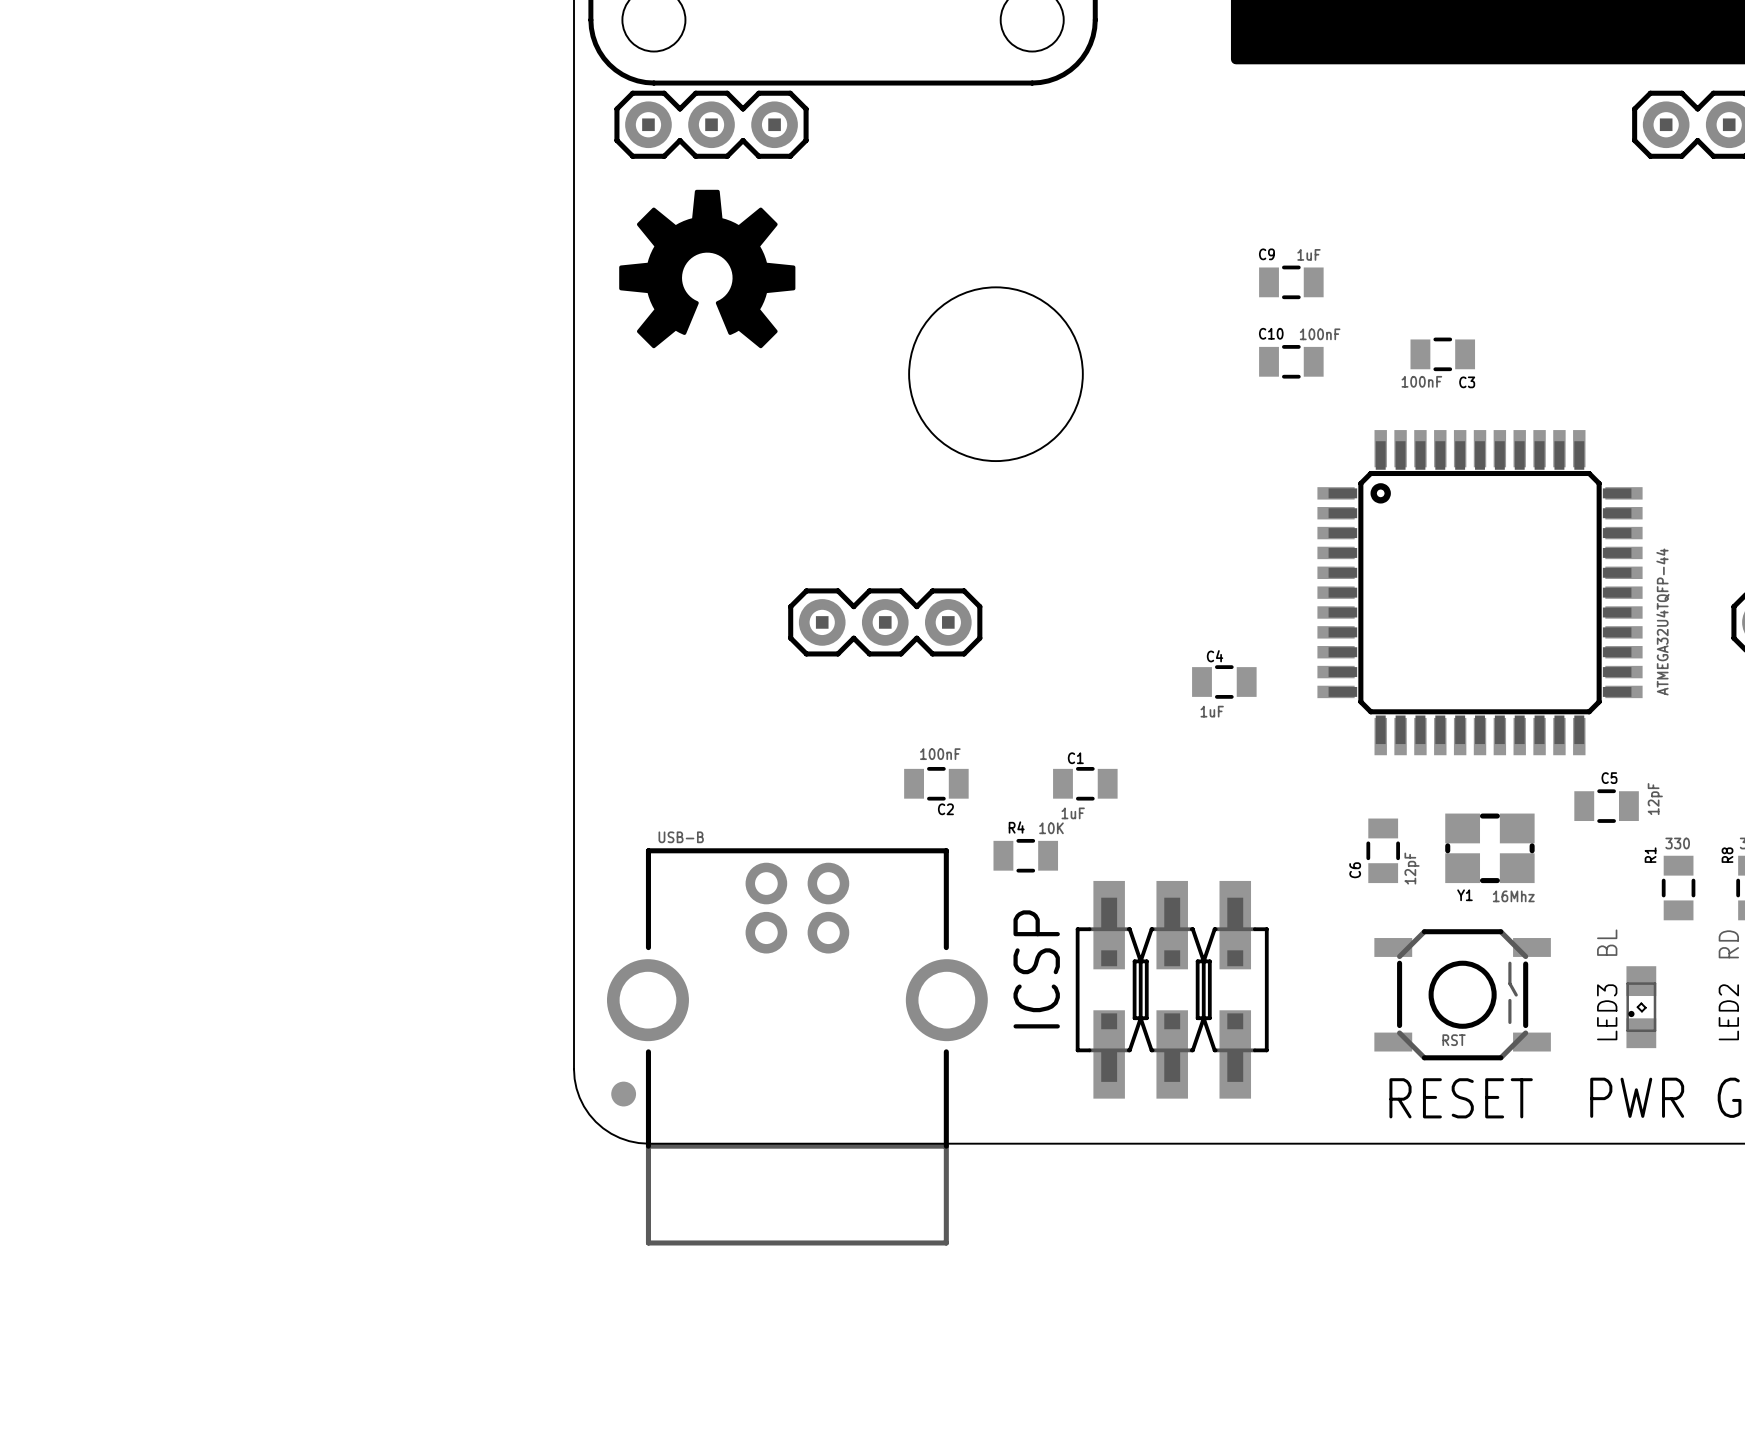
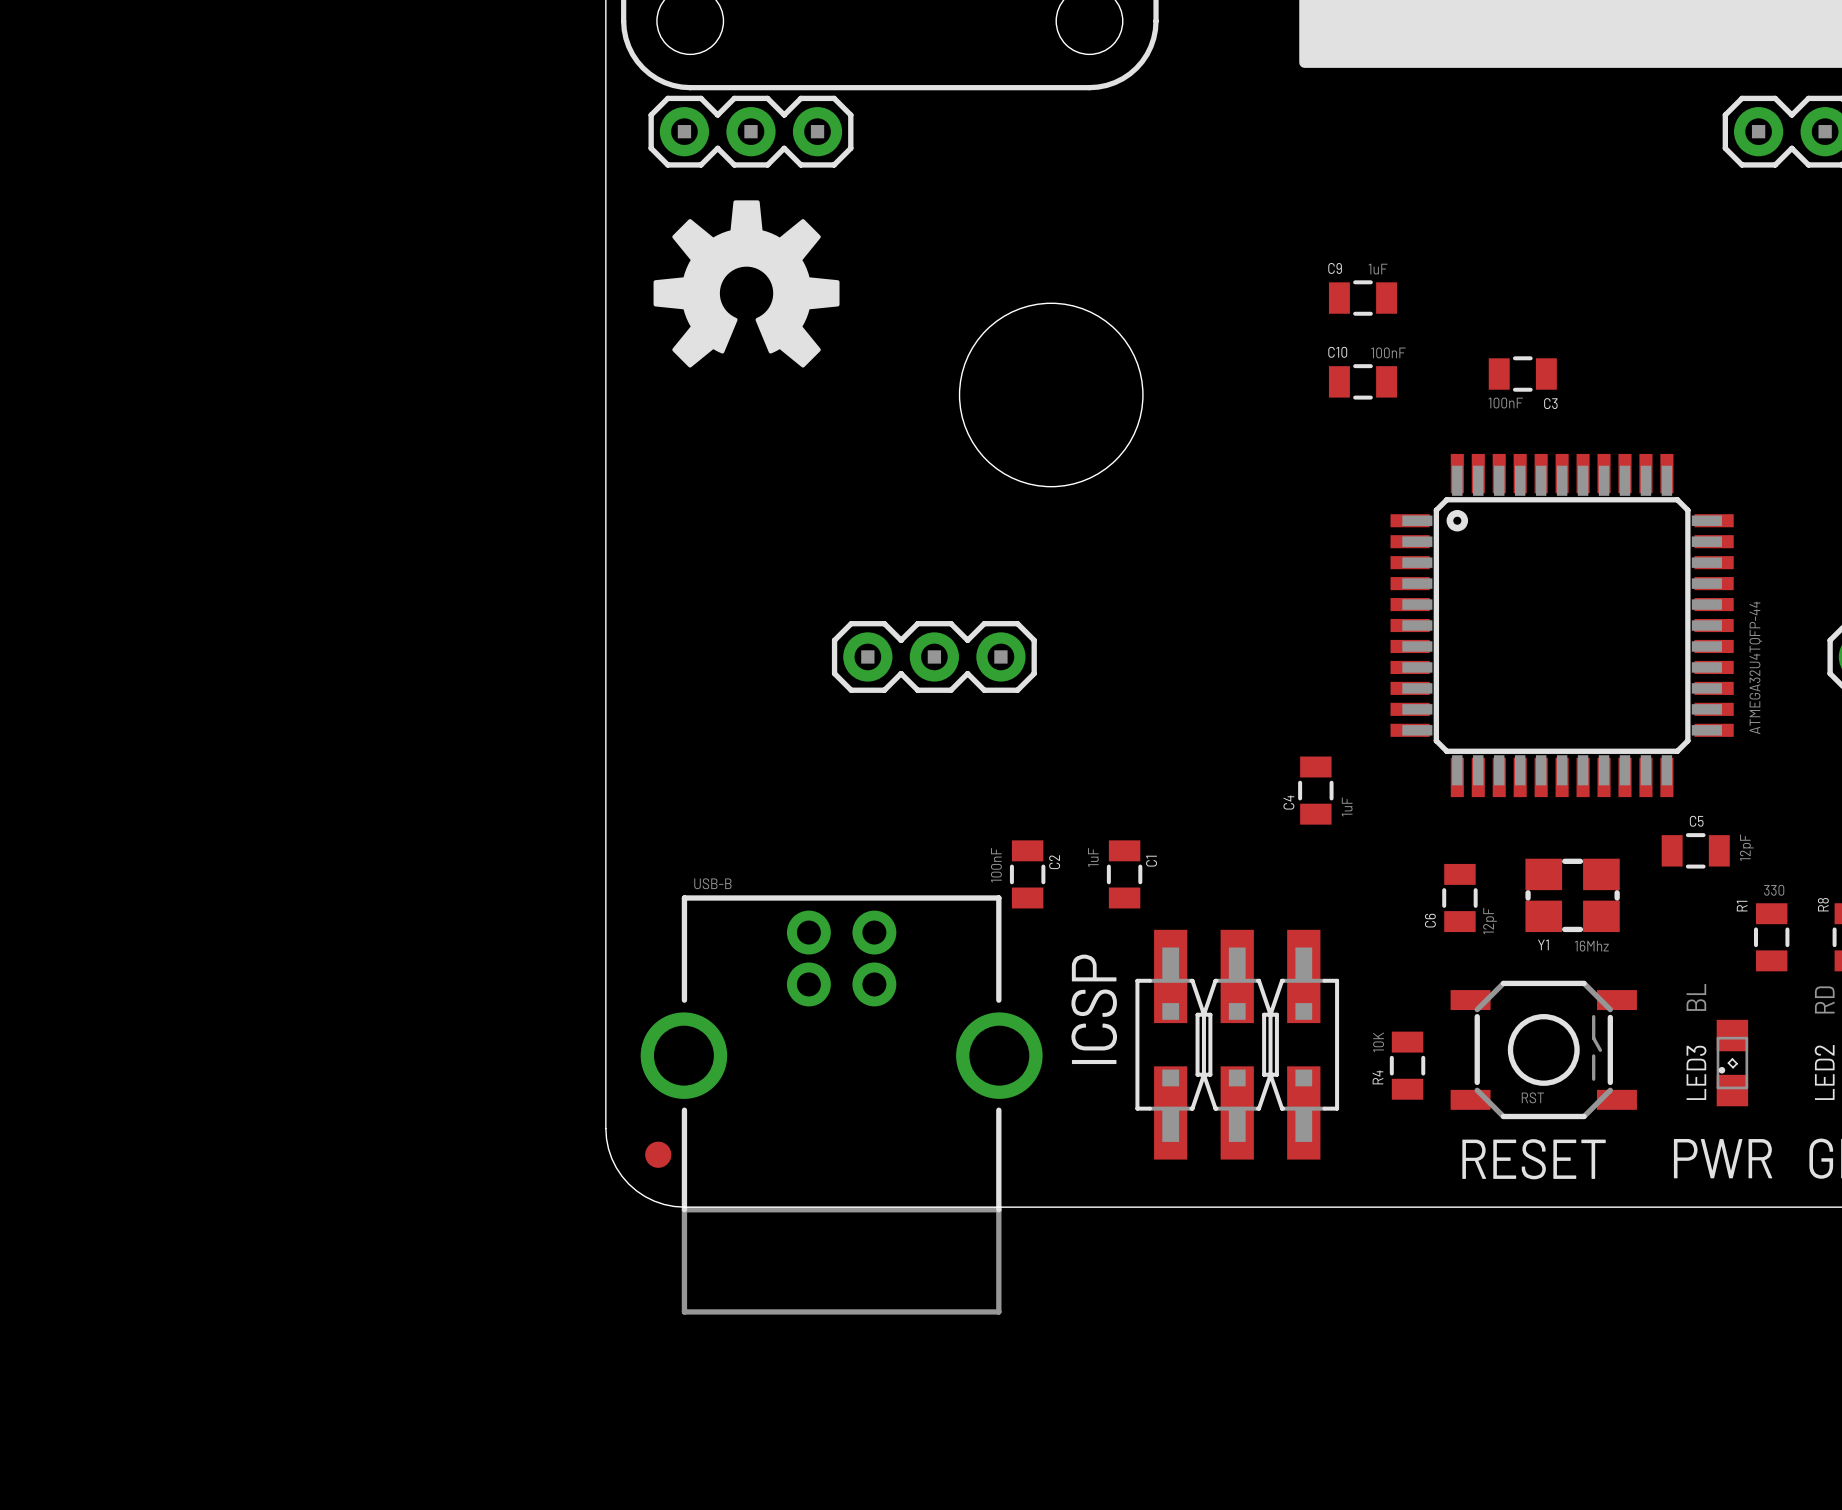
C4 rotation: 0° (1224, 682) -> 90° clockwise (1315, 790)
C4 position: (1224, 682) -> (1315, 790)
C2 rotation: 0° (936, 783) -> 90° clockwise (1027, 874)
C2 position: (936, 783) -> (1027, 874)
C1 rotation: 0° (1085, 783) -> 90° clockwise (1124, 874)
C1 position: (1085, 783) -> (1124, 874)
R4 value position: 10K (1051, 828) -> 10K (1378, 1042)
R4 rotation: 0° (1025, 855) -> 90° clockwise (1407, 1065)
R4 position: (1025, 855) -> (1407, 1065)

